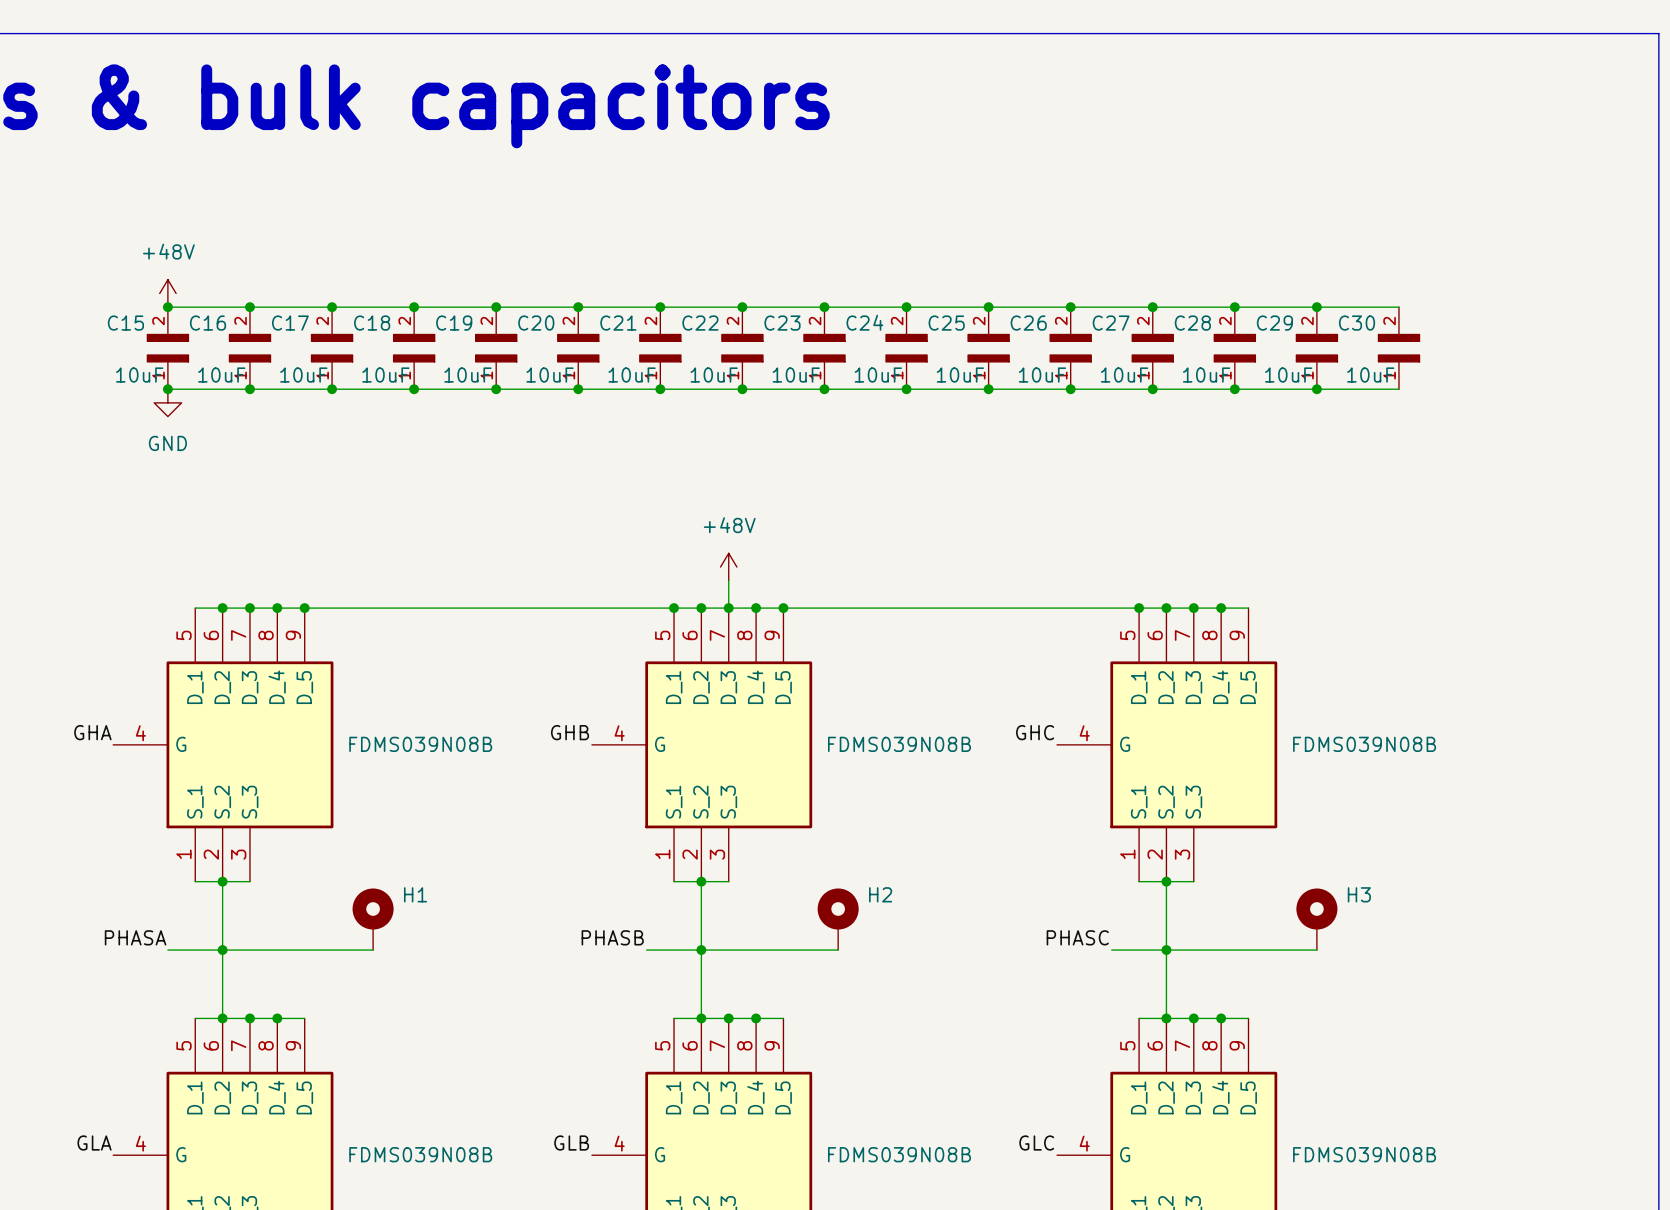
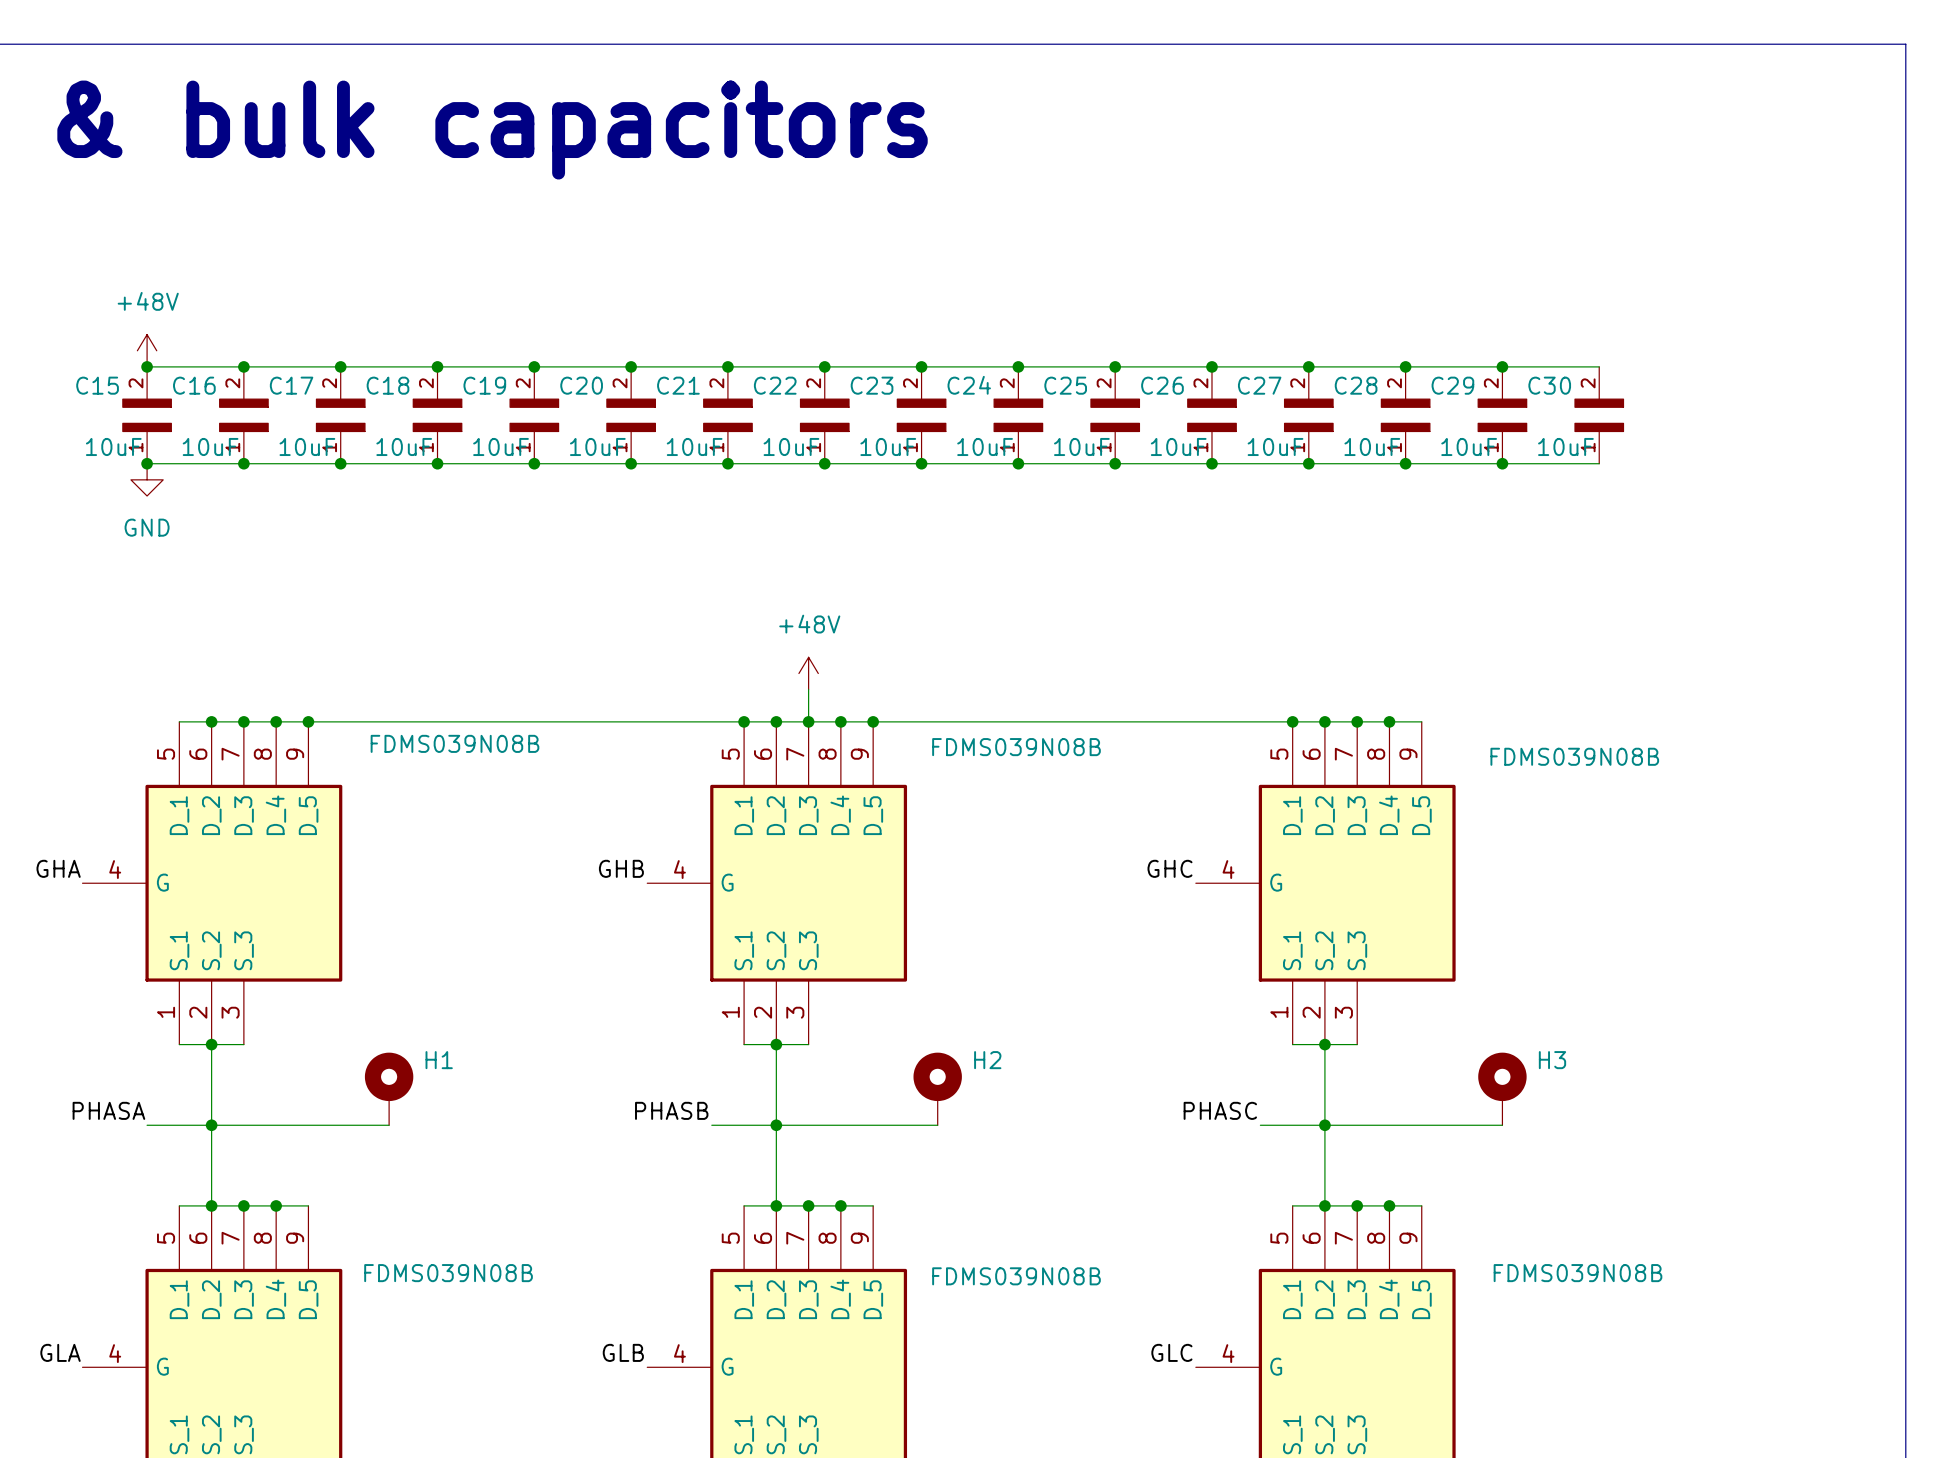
part value position: FDMS039N08B (420, 744) -> FDMS039N08B (454, 743)
part value position: FDMS039N08B (899, 744) -> FDMS039N08B (1016, 747)
part value position: FDMS039N08B (1364, 744) -> FDMS039N08B (1574, 756)
part value position: FDMS039N08B (420, 1154) -> FDMS039N08B (448, 1273)
part value position: FDMS039N08B (899, 1154) -> FDMS039N08B (1016, 1276)
part value position: FDMS039N08B (1364, 1154) -> FDMS039N08B (1577, 1273)

